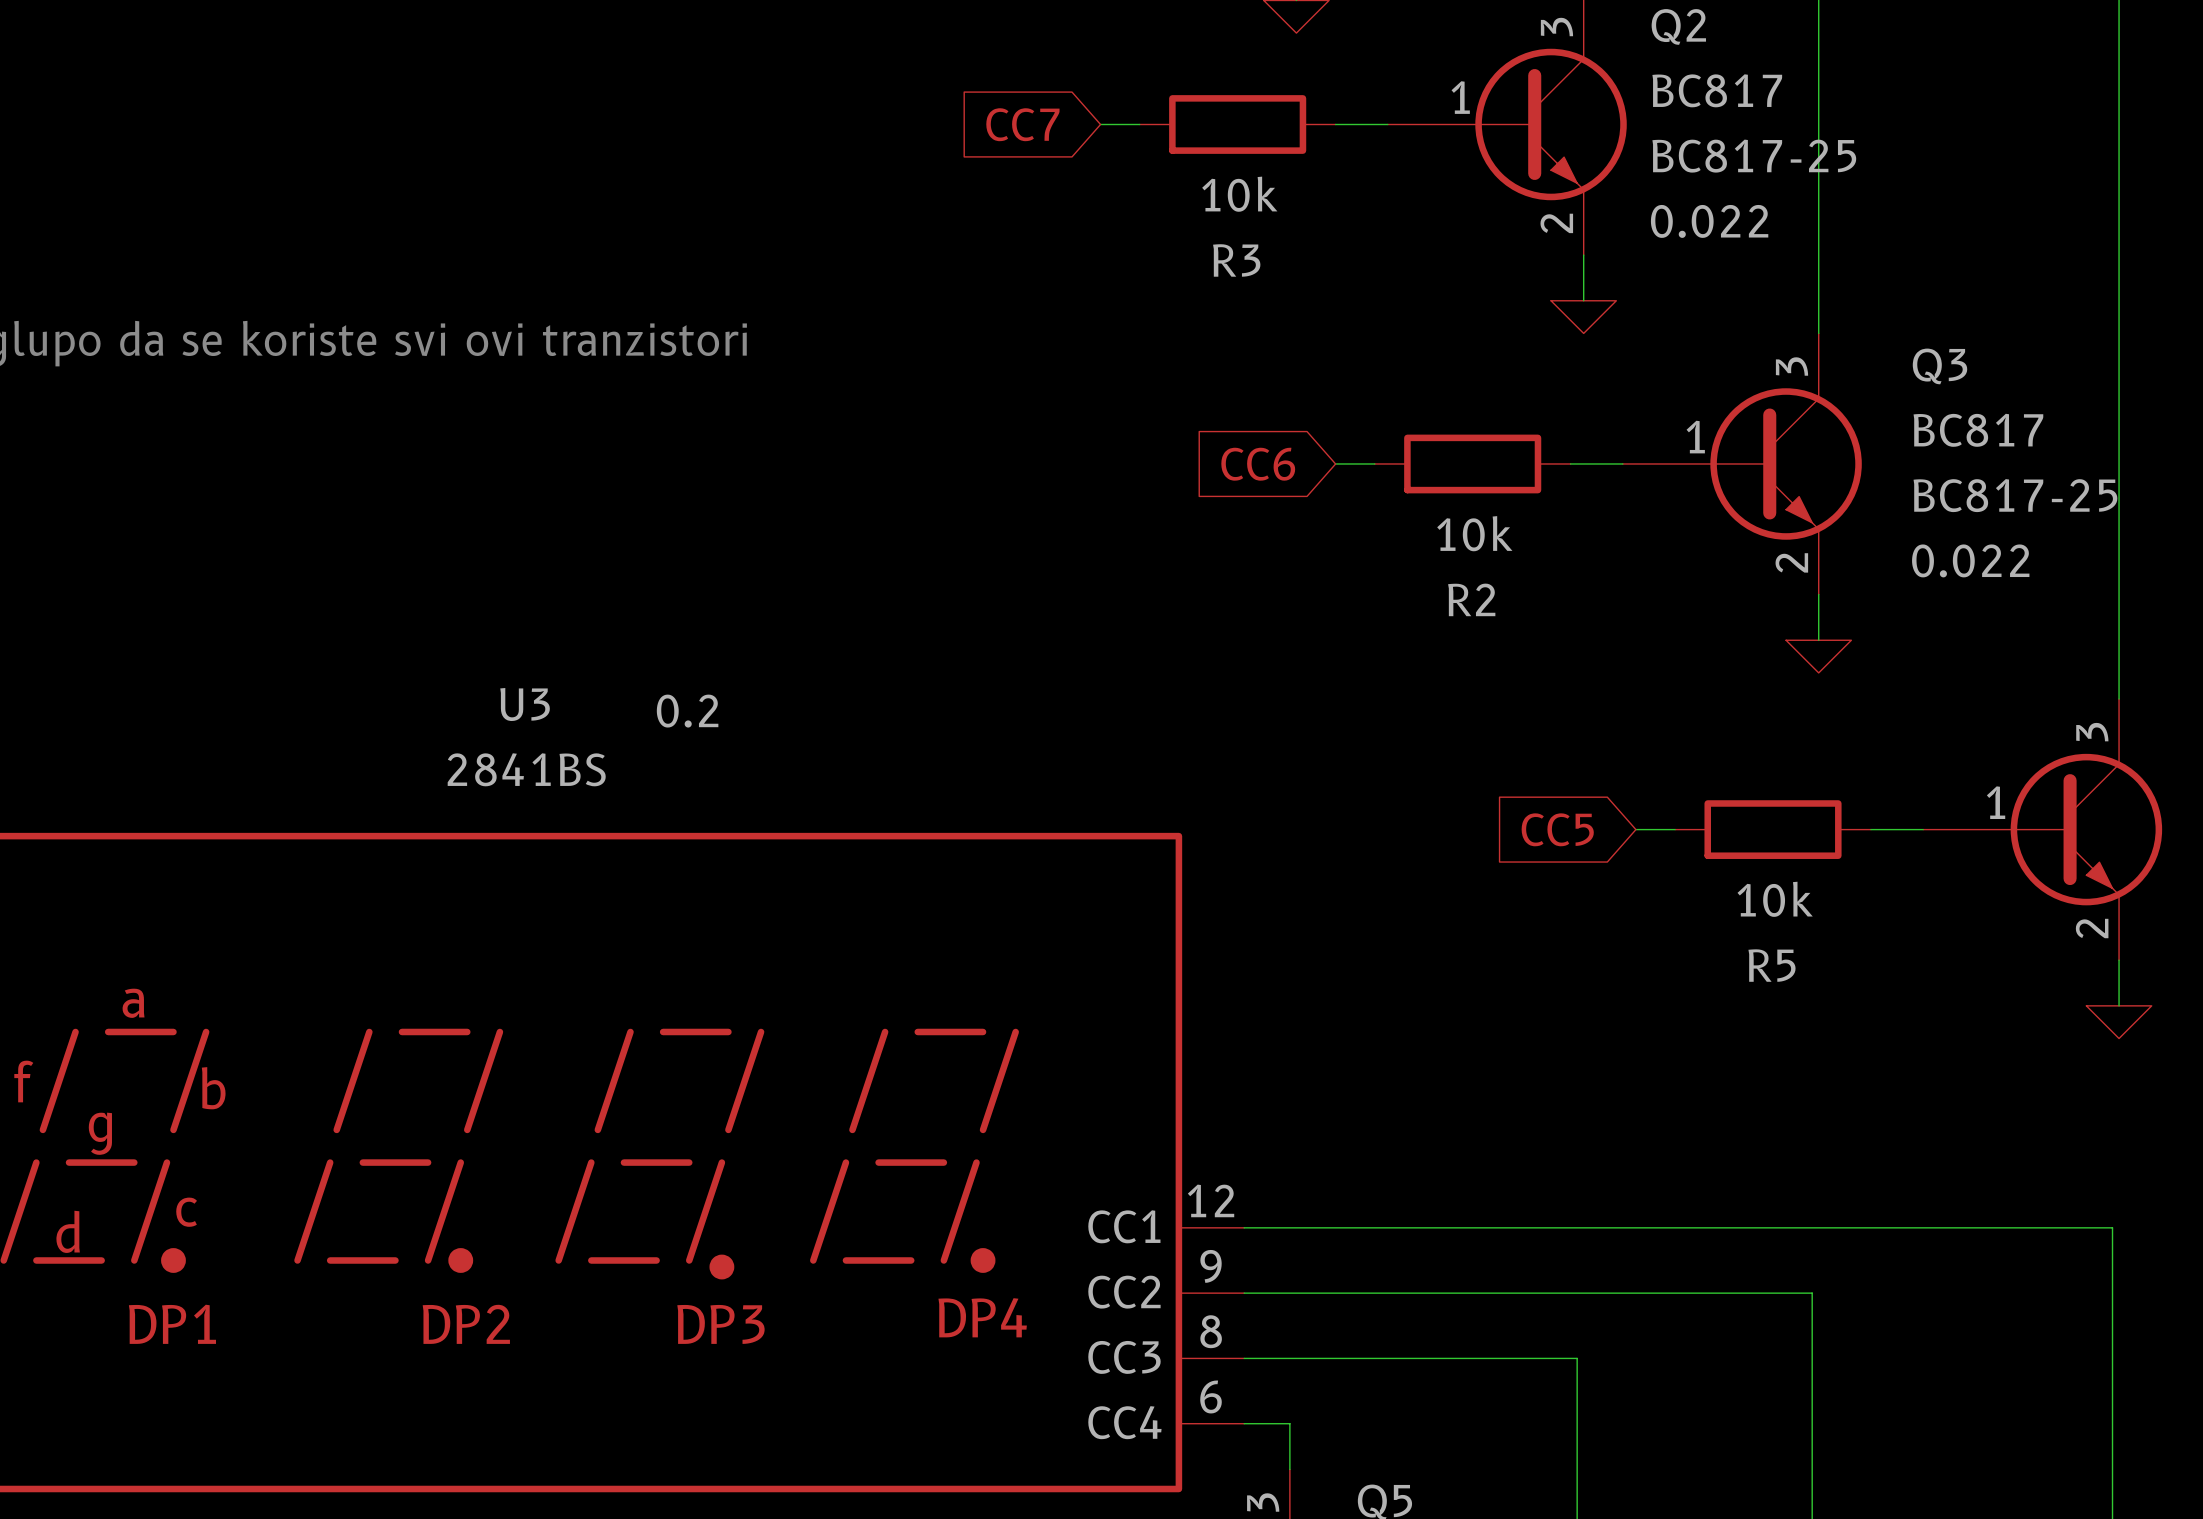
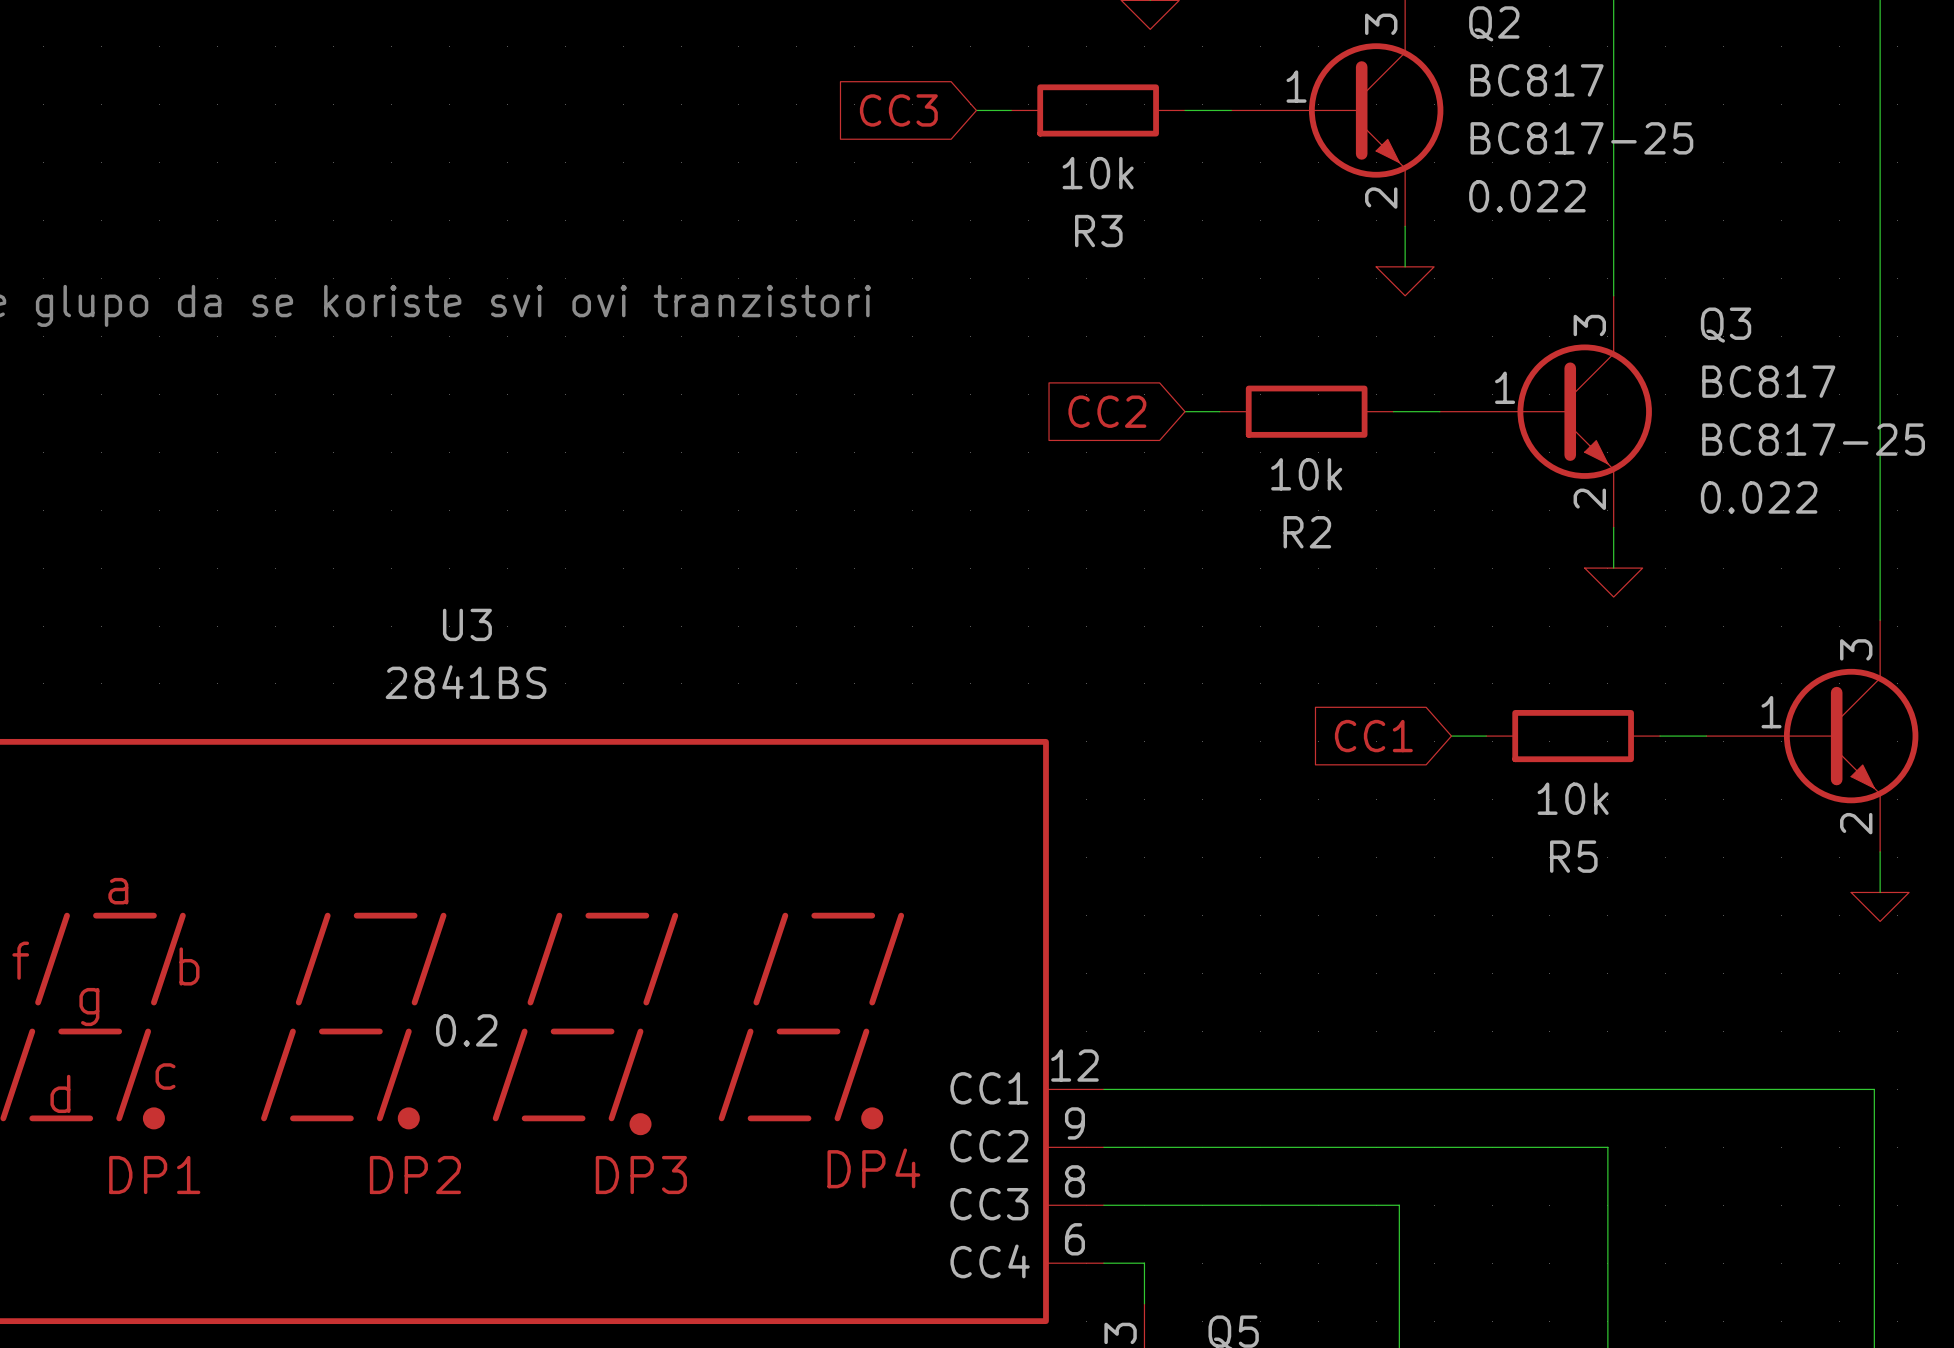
global label: CC7 (1022, 124) -> CC3 (898, 110)
global label: CC6 (1258, 464) -> CC2 (1107, 411)
U3 text position: 0.2 (687, 711) -> 0.2 (466, 1030)
global label: CC5 (1557, 829) -> CC1 (1373, 736)

